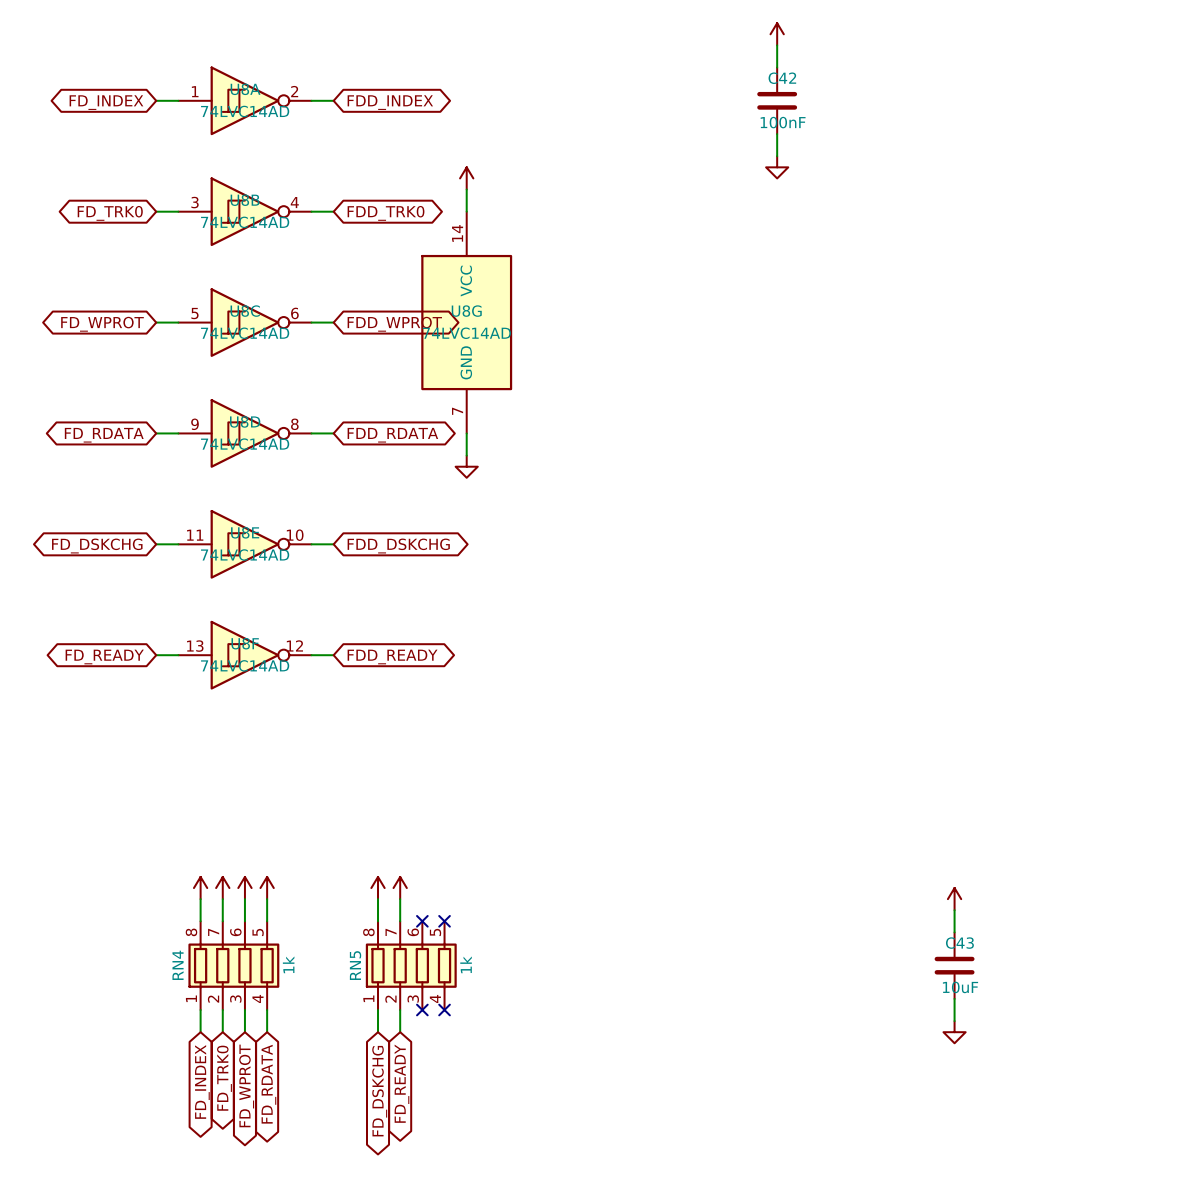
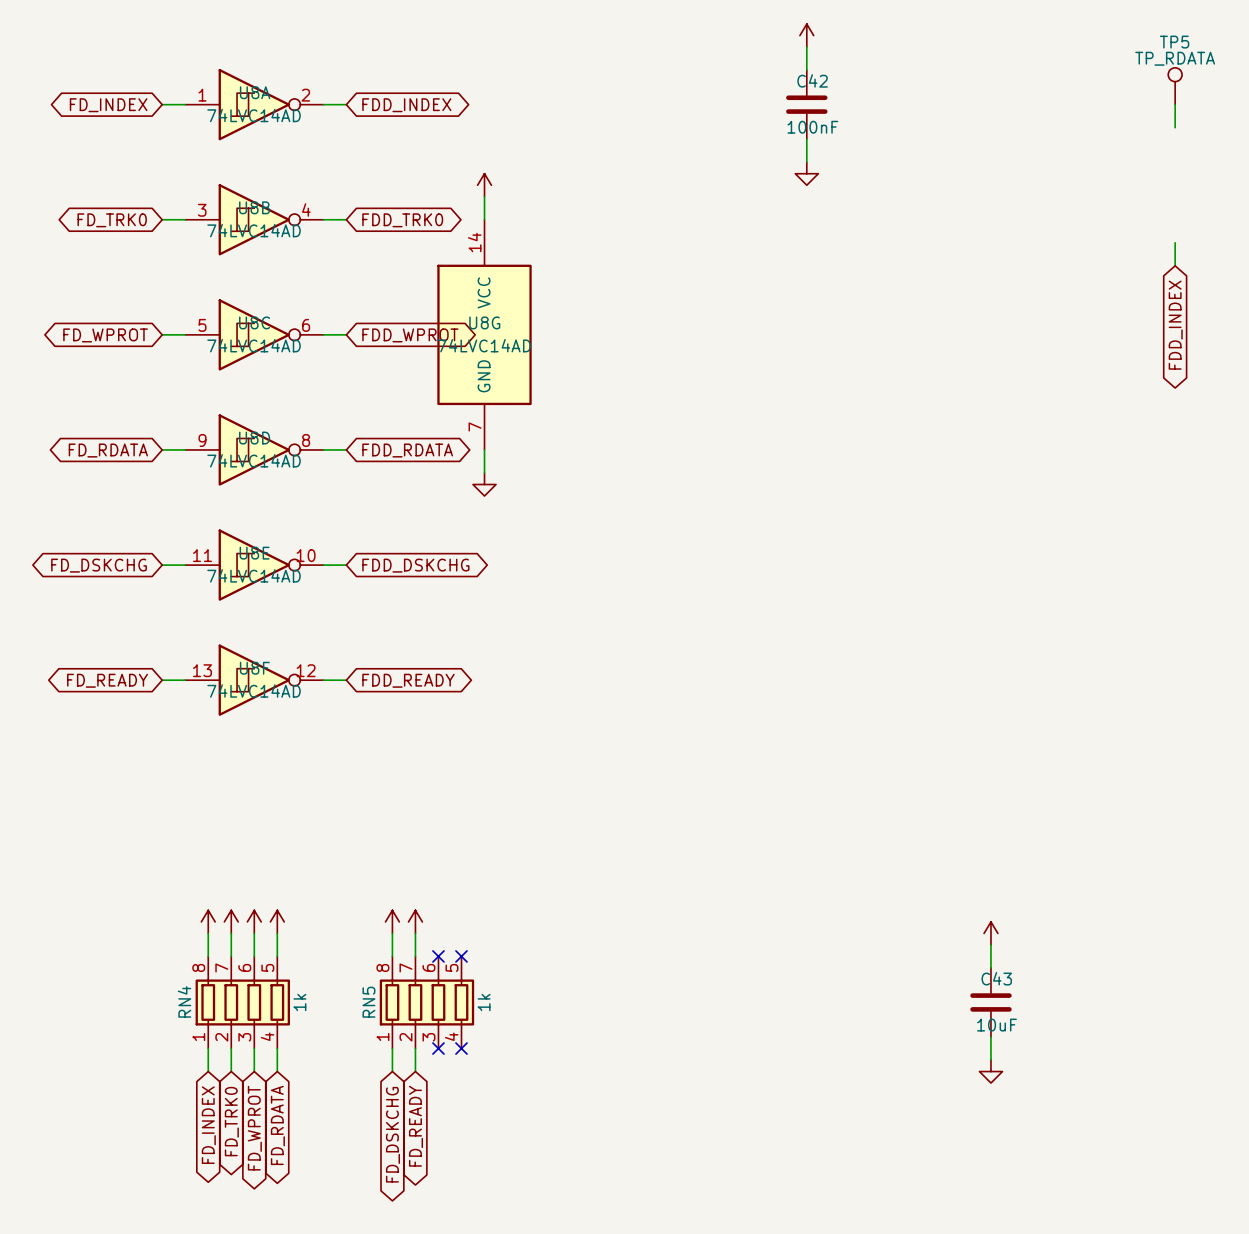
TP5: none -> TP_RDATA (1175, 86)
wire: none -> (1175, 104) (1175, 127)
wire: none -> (1175, 242) (1175, 265)
global label: none -> FDD_INDEX (1175, 325)

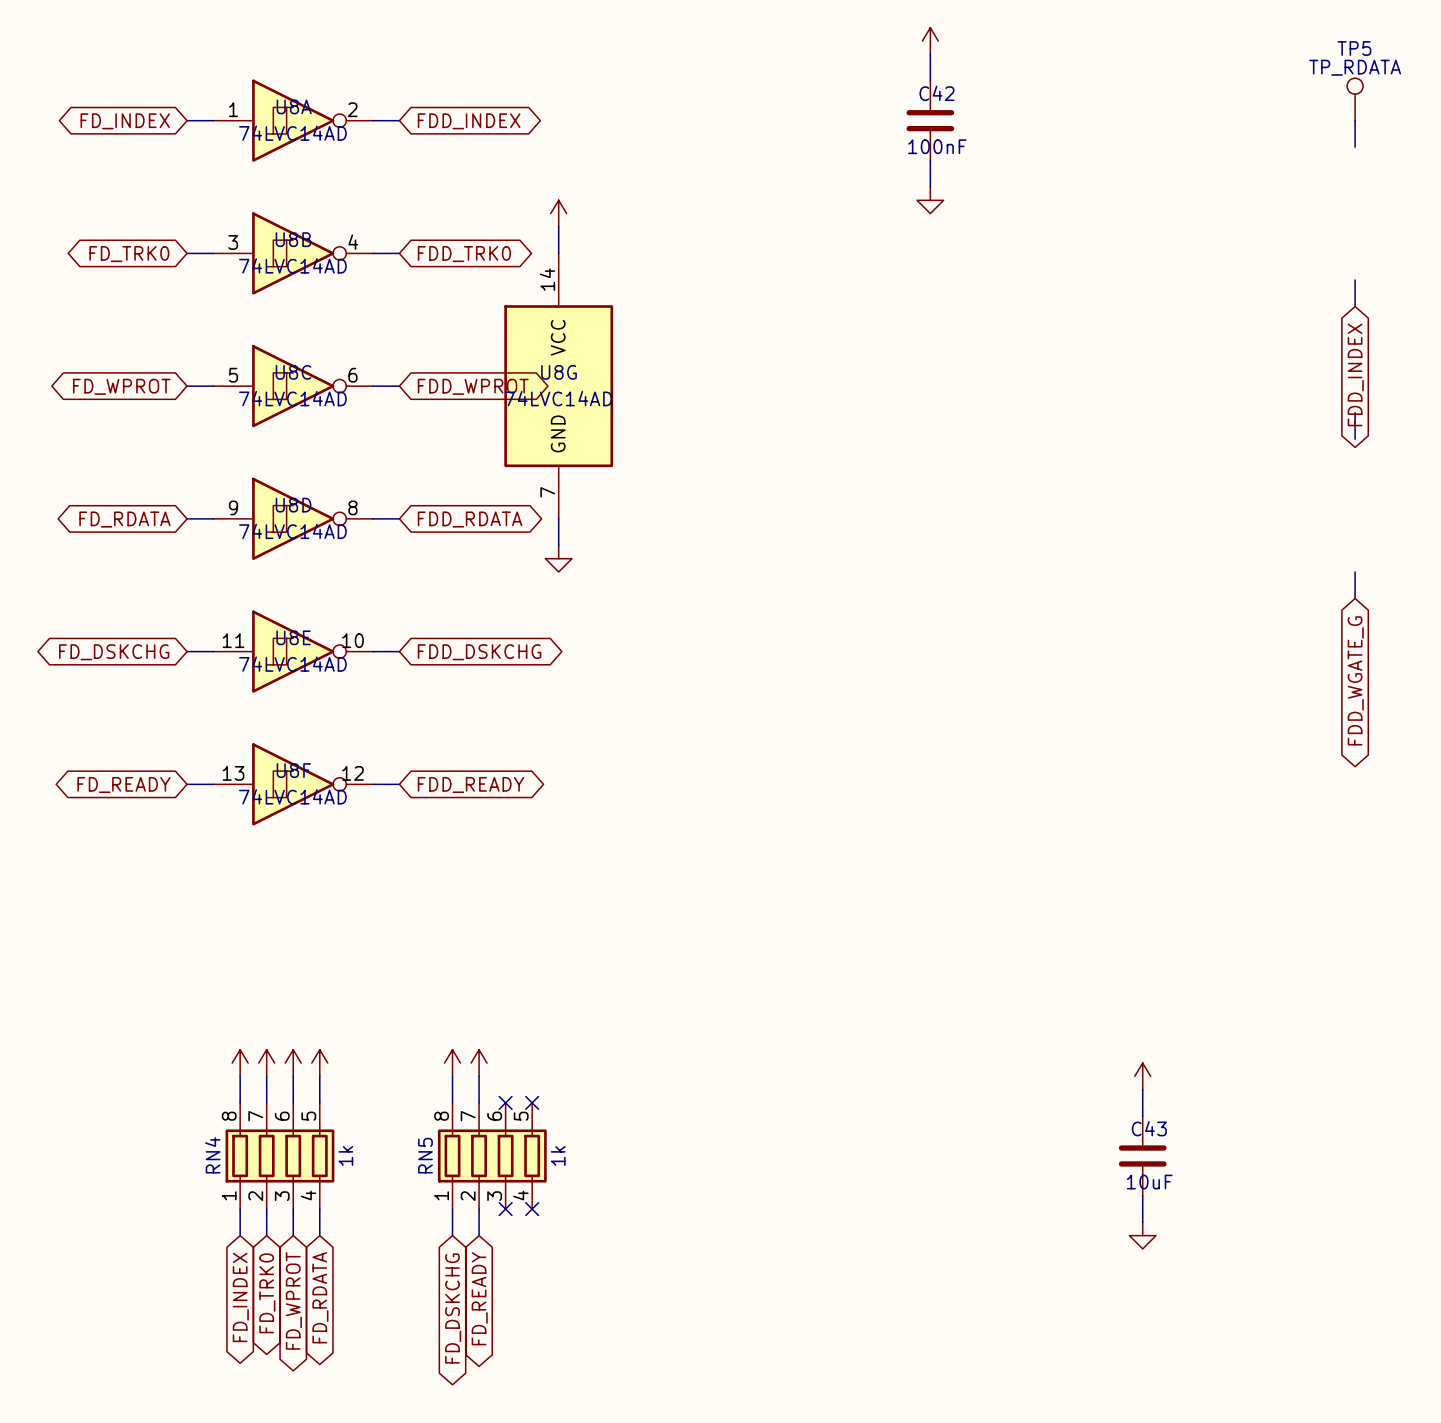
wire: none -> (1355, 412) (1355, 439)
wire: none -> (1355, 571) (1355, 598)
global label: none -> FDD_WGATE_G (1355, 680)

